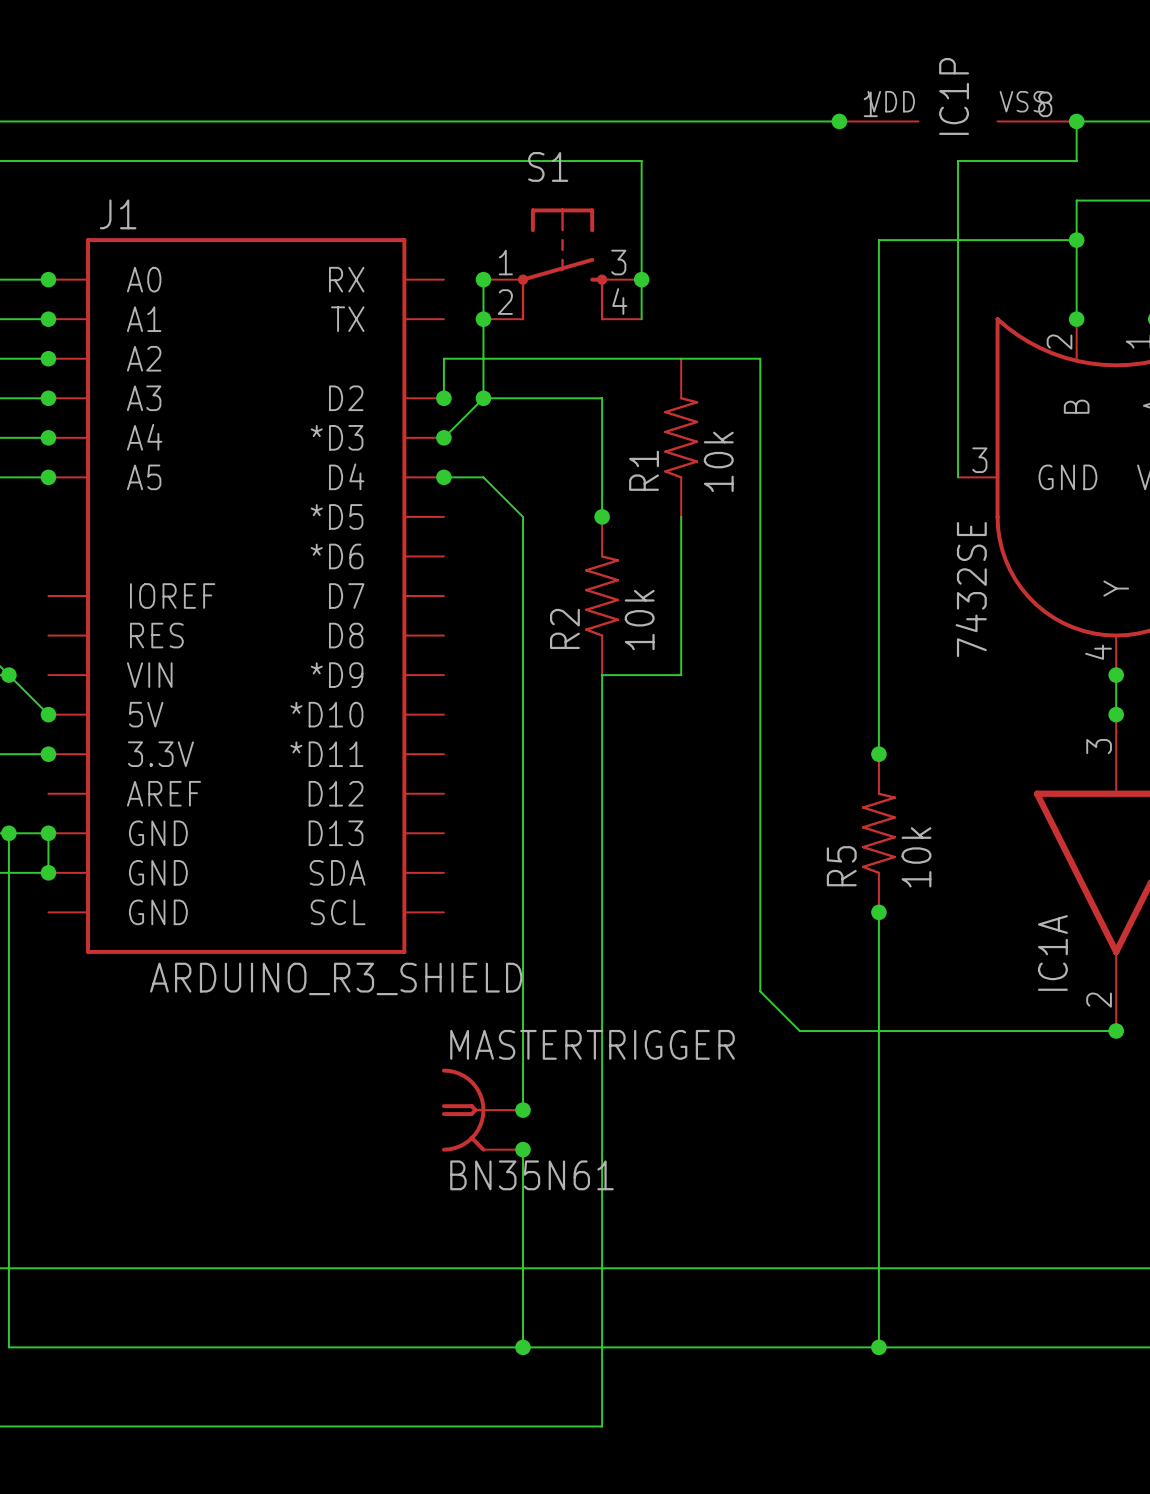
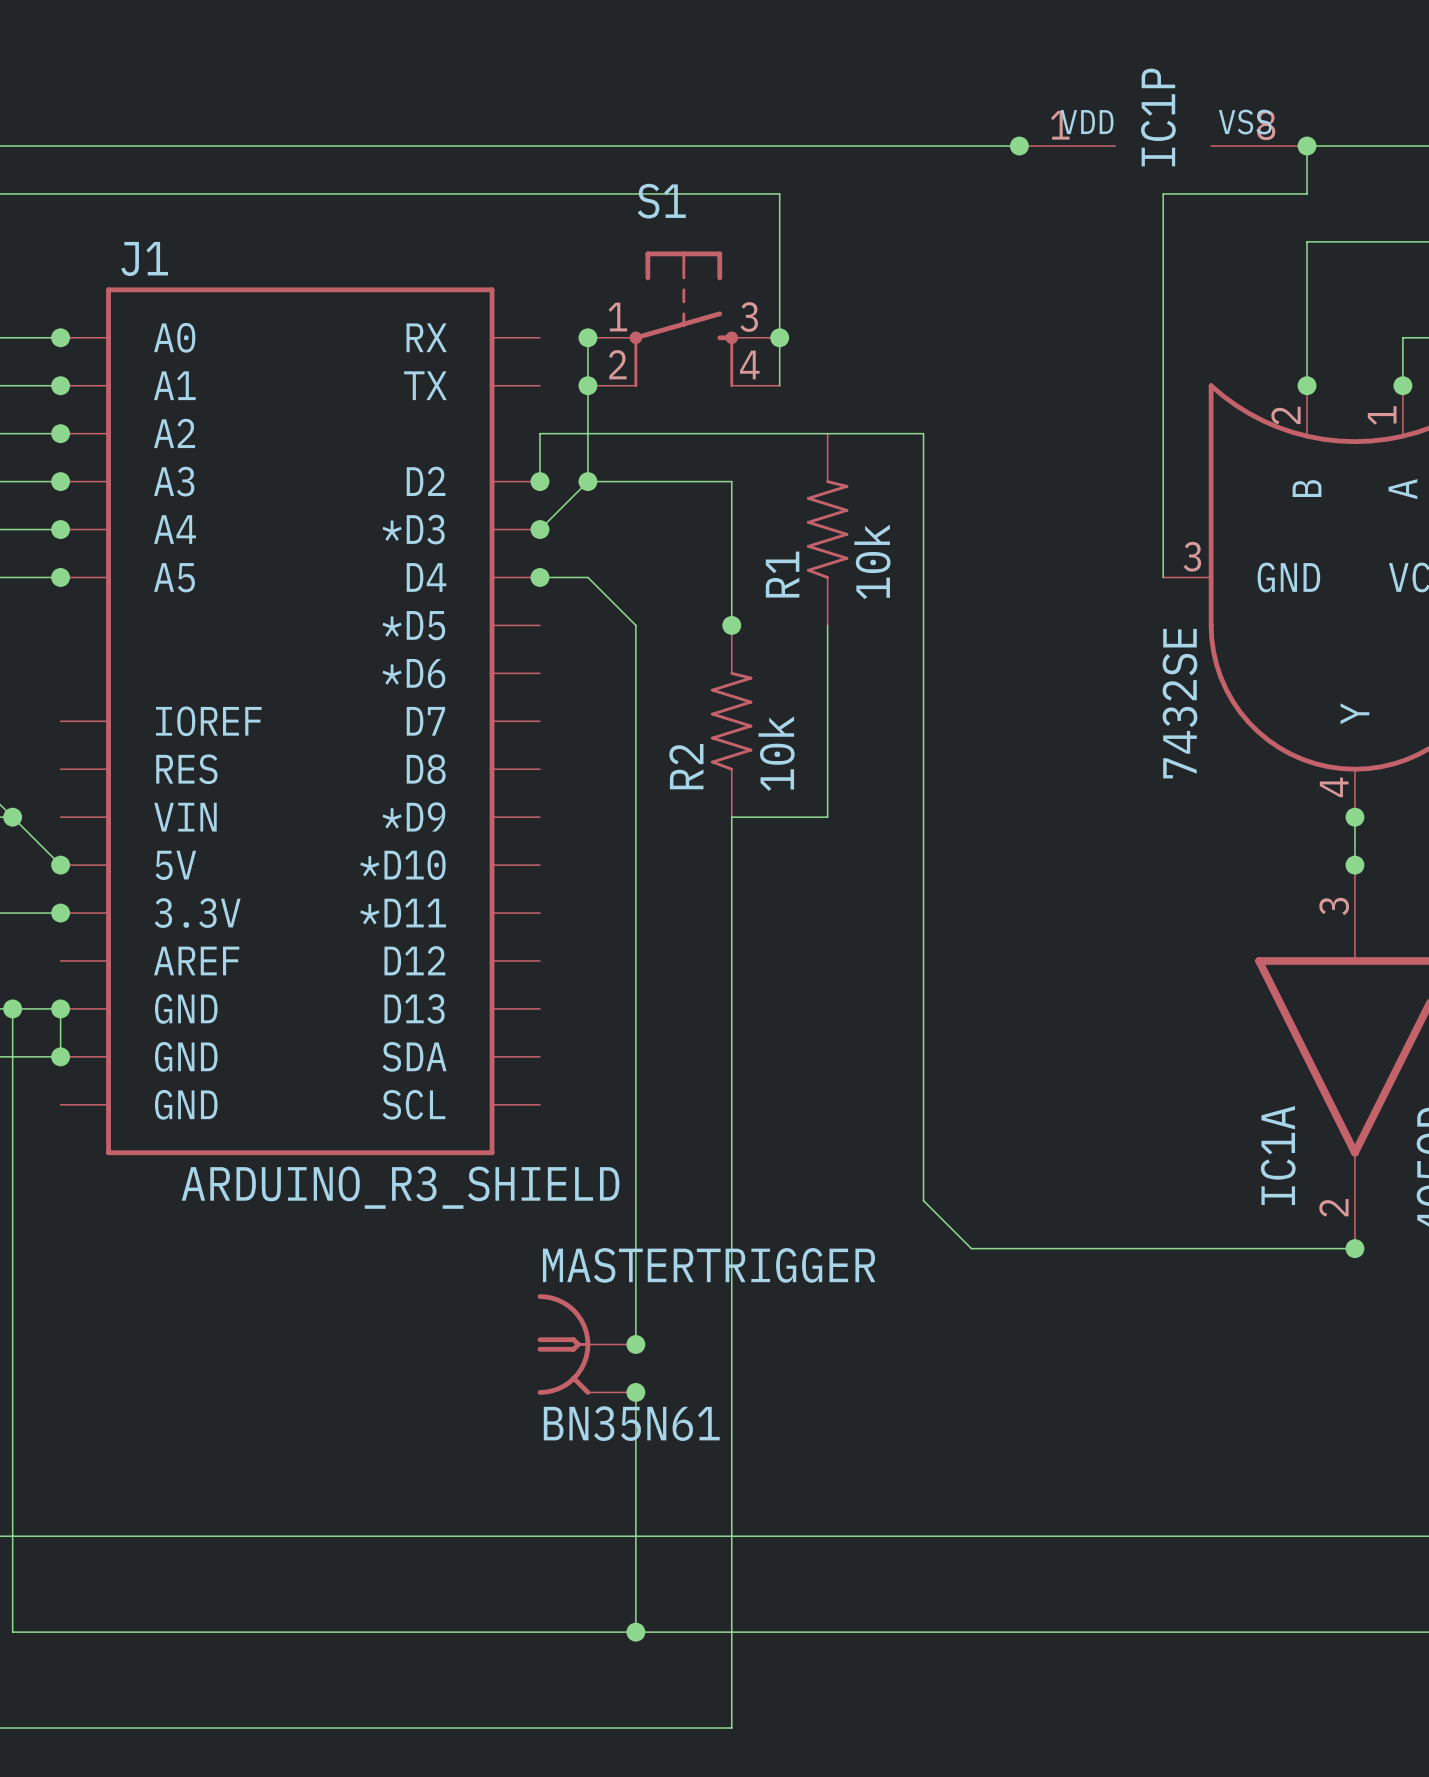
wire: (1076, 240) (878, 240) (878, 754) -> none
junction: (1076, 240) -> none
junction: (878, 754) -> none
R5: 10k (878, 833) -> none
wire: (878, 912) (878, 1347) -> none
junction: (878, 912) -> none
junction: (878, 1347) -> none

